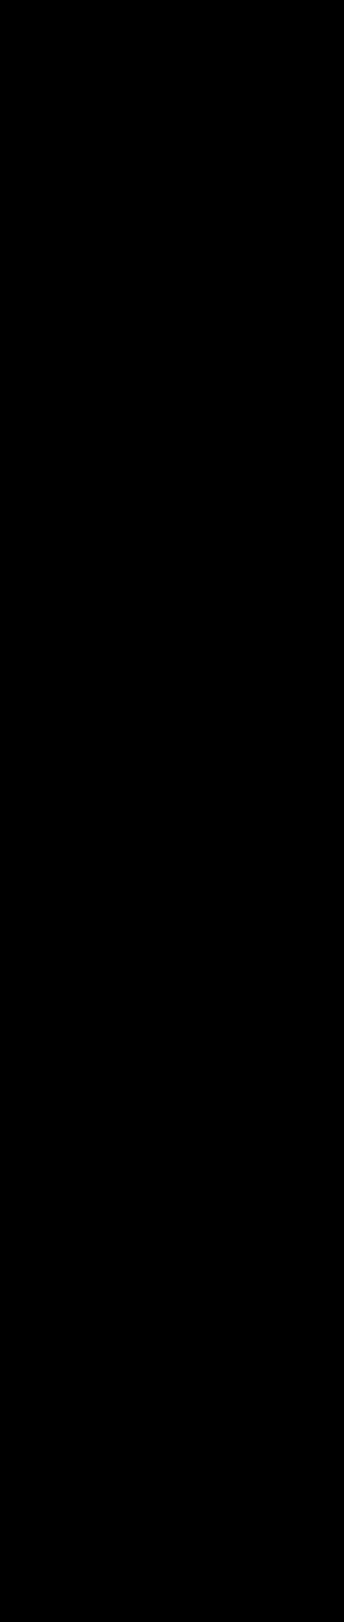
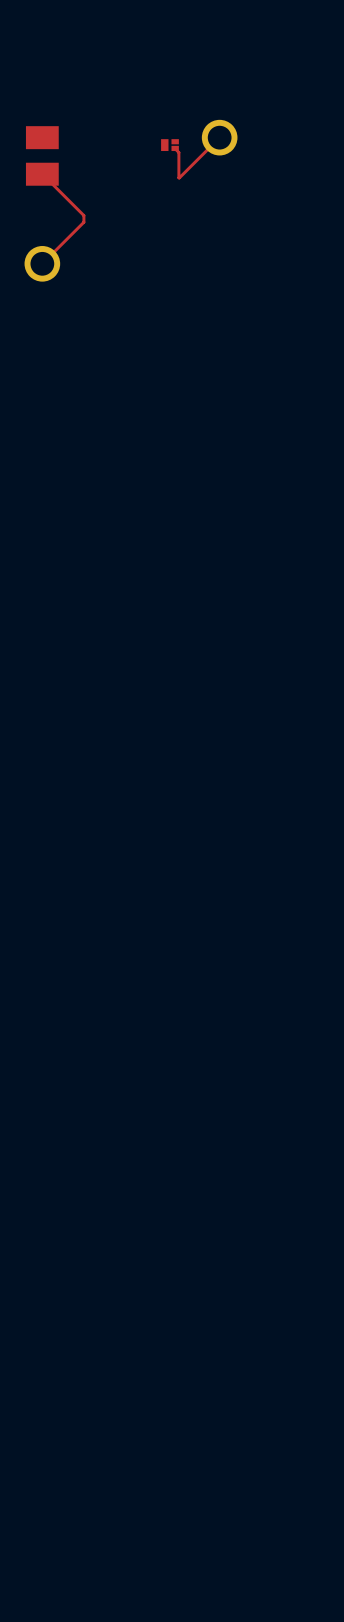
top track: none -> (219, 137) (179, 177) (178, 152) (175, 148)
part: none -> (219, 137)
part: none -> (169, 145)
part: none -> (42, 155)
top track: none -> (42, 174) (83, 215) (83, 222) (42, 263)
part: none -> (42, 263)

